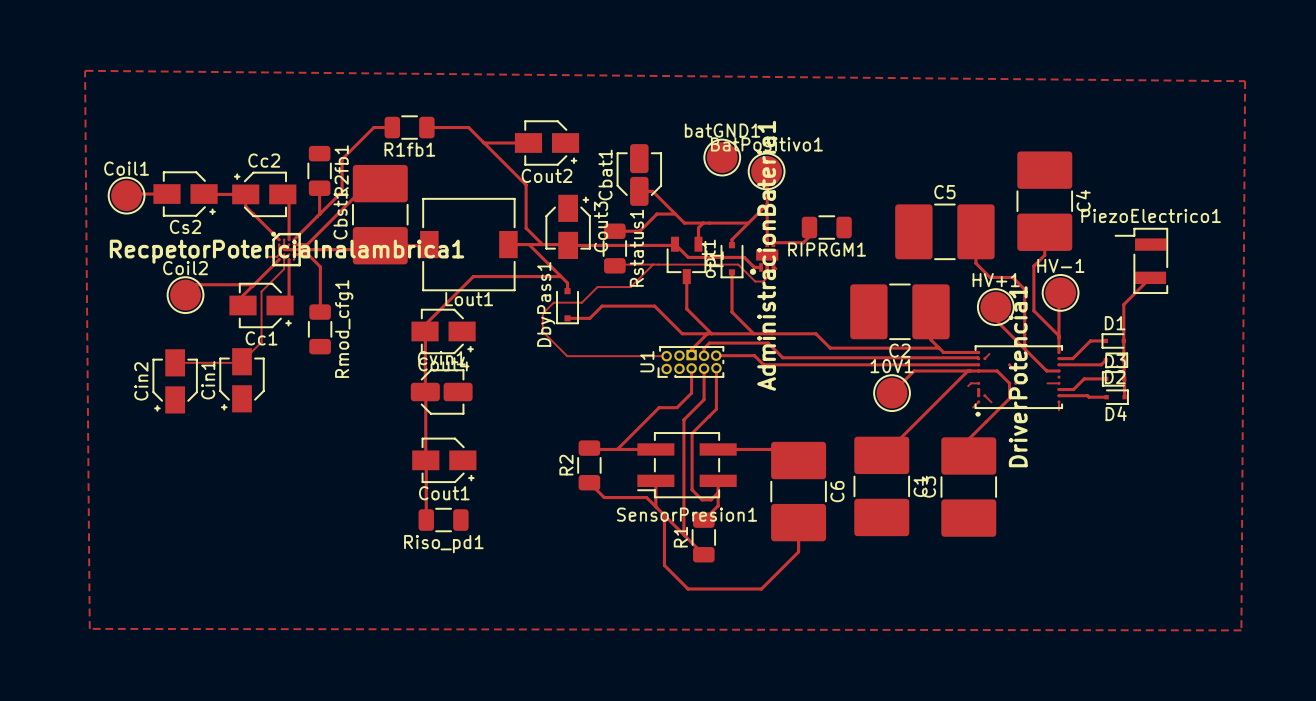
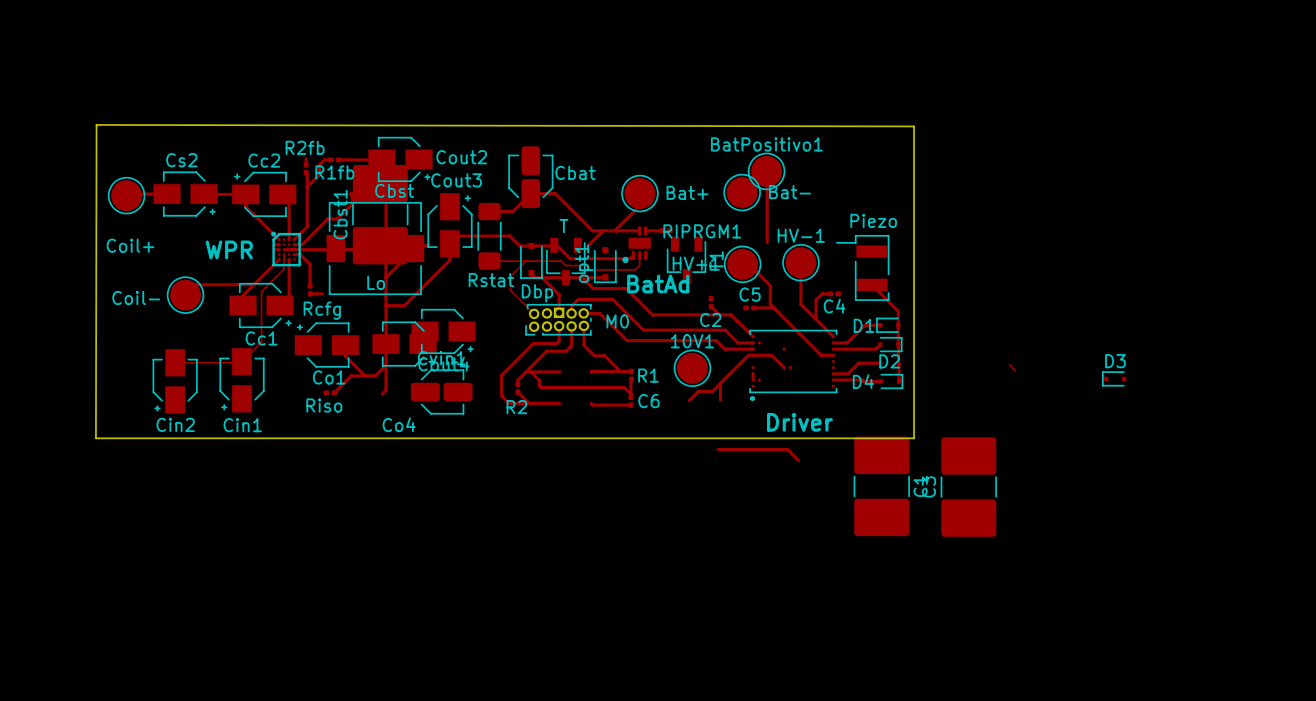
zone outline: (85, 70) (89, 628) (1241, 630) (1245, 81) (85, 70) -> none
board edge: none -> (96, 124) (95, 438) (914, 438) (914, 126) (96, 124)
track: (392, 127) (373, 127) (342, 159) (342, 191) (319, 214) -> none
R1fb1: (409, 127) -> none
track: (426, 127) (468, 127) (526, 185) (526, 228) (542, 244) -> none
track: (484, 142) (528, 142) -> none
Cout2 position: (547, 142) -> (400, 159)
C4 footprint: [1016, 151, 1073, 251] -> [827, 291, 842, 297]
batGND1: (722, 157) -> none
track: none -> (306, 158) (306, 164)
track: none -> (330, 159) (324, 159) (319, 164) (319, 174) (307, 186)
R1fb: none -> (334, 159)
track: none -> (338, 159) (381, 159) (385, 163) (385, 390) (382, 394)
Coil1 name: Coil1 (126, 168) -> Coil+ (130, 245)
R2fb: none -> (306, 168)
R2fb1: (319, 170) -> none
Cout2 name position: Cout2 (547, 175) -> Cout2 (461, 157)
Cbat1: (639, 175) -> none
Cbat: none -> (530, 177)
track: (380, 183) (368, 183) (307, 244) (302, 244) -> (352, 194) (352, 204) (337, 218) (327, 218) (302, 244)
track: (319, 188) (319, 214) (317, 216) -> none
track: (639, 191) (652, 191) (684, 223) (748, 223) -> none
Bat-: none -> (742, 192)
C5 name position: C5 (944, 192) -> C5 (750, 294)
track: none -> (639, 193) (639, 205) (615, 230)
Bat+: none -> (639, 193)
Cbst: none -> (356, 194)
C4 name position: C4 (1083, 200) -> C4 (834, 306)
C5 footprint: [895, 203, 995, 260] -> [743, 305, 757, 311]
track: (767, 204) (748, 223) -> none
track: none -> (489, 211) (512, 211) (530, 193) (555, 193) (592, 230) (639, 230)
track: (675, 214) (656, 214) (639, 231) (614, 231) -> none
RIPRGM1 footprint: [801, 215, 852, 240] -> [659, 228, 673, 234]
track: (317, 216) (301, 231) -> (306, 172) (307, 226) (301, 231)
track: (703, 223) (698, 227) (698, 244) -> none
track: (748, 223) (731, 239) (731, 245) -> none
Cs2 name position: Cs2 (185, 226) -> Cs2 (181, 160)
Cout3 position: (568, 226) -> (449, 225)
Cout3 name rotation: 0° (601, 226) -> 90° clockwise (456, 180)
track: (809, 227) (809, 236) (803, 242) (773, 242) -> none
track: none -> (603, 230) (588, 245)
track: none -> (661, 230) (645, 230)
track: (975, 231) (975, 263) (990, 277) (1012, 277) (1024, 289) (1024, 348) -> none
track: (1044, 232) (1044, 255) (1033, 266) (1033, 310) (1058, 335) -> none
Rstat: none -> (489, 236)
track: (284, 239) (284, 244) -> none
track: (279, 244) (279, 254) (276, 256) (266, 256) -> (279, 244) (274, 244)
Lout1: (468, 244) -> none
track: (508, 244) (675, 244) (688, 257) (744, 257) (754, 267) (761, 267) -> none
track: (529, 244) (567, 283) (567, 291) -> none
BatAd: none -> (636, 244)
Lo: none -> (375, 248)
track: none -> (414, 248) (385, 277)
Rstatus1: (614, 248) -> none
track: none -> (273, 249) (279, 249)
RIPRGM1 name position: RIPRGM1 (827, 249) -> RIPRGM1 (702, 231)
RecpetorPotenciaInalambrica1 name: RecpetorPotenciaInalambrica1 (286, 251) -> WPR (229, 249)
track: (300, 254) (308, 254) (320, 266) (320, 312) -> (300, 254) (309, 264) (310, 285)
track: none -> (633, 255) (630, 258) (570, 258) (556, 245) (519, 245) (509, 236) (457, 236) (449, 243) (449, 260) (404, 305) (385, 305)
track: none -> (639, 255) (639, 265) (635, 269) (589, 269) (585, 265) (565, 265) (561, 261) (489, 261)
AdministracionBateria1: (764, 256) -> none
Dbp: none -> (531, 260)
opt1 position: (731, 260) -> (605, 265)
PiezoElectrico1: (1141, 260) -> none
track: none -> (525, 261) (510, 276) (510, 290) (534, 313)
T: none -> (565, 261)
track: none -> (800, 262) (800, 304) (812, 316)
track: (653, 264) (630, 287) (597, 287) (581, 302) (553, 302) (542, 313) (542, 331) (567, 356) (666, 356) -> none
track: none -> (742, 264) (748, 264) (770, 285) (770, 304) (821, 355) (833, 355)
track: (614, 265) (738, 264) (755, 281) (763, 281) (767, 277) (767, 267) -> none
track: (773, 267) (776, 268) -> none
Piezo: none -> (862, 267)
Coil2 name: Coil2 (185, 268) -> Coil- (136, 297)
track: (731, 272) (731, 312) (753, 333) -> none
track: none -> (531, 273) (533, 277) (605, 277)
track: (560, 276) (473, 276) (425, 324) (426, 520) -> none
track: (686, 276) (686, 308) (711, 333) -> none
track: none -> (541, 277) (559, 294) (559, 312)
track: none -> (582, 277) (593, 288) (626, 288) (652, 314) (730, 314) (753, 336)
track: (1150, 277) (1123, 304) (1124, 397) -> none
HV+1 name position: HV+1 (996, 280) -> HV+1 (696, 263)
C2 footprint: [850, 283, 950, 340] -> [708, 295, 714, 310]
track: none -> (871, 284) (898, 311) (899, 381)
Rcfg: none -> (310, 289)
track: (1060, 292) (1058, 294) (1058, 352) -> none
HV-1 position: (1060, 292) -> (800, 262)
track: none -> (310, 293) (322, 293)
track: none -> (830, 293) (822, 293) (816, 300) (816, 319)
DbyPass1: (567, 306) -> none
track: none -> (711, 306) (719, 314)
track: none -> (753, 307) (773, 307)
track: (995, 307) (995, 320) (1046, 370) (1058, 370) -> none
HV+1 position: (995, 307) -> (742, 264)
track: (930, 311) (930, 339) (943, 352) (978, 352) -> none
track: none -> (571, 313) (571, 306) (578, 299) (612, 299) (643, 330) (725, 330) (738, 342) (753, 342)
track: none -> (583, 313) (599, 313) (626, 340) (716, 340) (724, 349) (753, 349)
track: none -> (813, 316) (833, 336)
track: (567, 318) (589, 318) (602, 306) (654, 306) (682, 333) (815, 333) (830, 348) (939, 348) -> none
M0: none -> (558, 319)
D1 name position: D1 (1115, 323) -> D1 (864, 325)
track: none -> (583, 325) (583, 345) (594, 355) (604, 355) (620, 371)
track: none -> (559, 326) (559, 341) (556, 343) (533, 343) (501, 375) (501, 395) (509, 403) (559, 403)
track: none -> (571, 326) (571, 345) (566, 351) (546, 351) (517, 380) (517, 384)
Rmod_cfg1: (320, 329) -> none
track: (707, 333) (691, 349) (691, 355) -> none
track: (1105, 340) (1090, 340) (1072, 358) (1058, 358) -> (880, 325) (864, 325) (847, 342) (833, 342)
D1 position: (1113, 340) -> (888, 325)
Co4: none -> (404, 344)
Co1: none -> (326, 345)
track: none -> (345, 345) (345, 356) (365, 375)
track: (989, 353) (984, 358) -> none
track: (704, 355) (704, 348) (709, 343) (768, 343) (782, 357) (978, 358) -> none
track: (716, 355) (754, 355) (763, 364) (978, 364) -> none
track: (1105, 360) (1101, 364) (1058, 364) -> (880, 344) (875, 349) (833, 349)
D2 position: (1115, 360) -> (890, 344)
U1: (690, 361) -> none
Driver: none -> (793, 365)
track: none -> (385, 366) (375, 375) (351, 375) (334, 392)
track: none -> (784, 367) (771, 355) (748, 355) (720, 383) (720, 400)
track: (691, 368) (691, 393) (677, 407) (659, 407) (617, 449) (614, 449) -> none
track: (704, 368) (704, 399) (683, 419) (684, 535) -> none
track: (716, 368) (716, 409) (709, 416) -> none
track: (967, 370) (881, 455) -> none
track: none -> (526, 371) (559, 371)
track: none -> (531, 371) (539, 380) (541, 387) (624, 387) (630, 394)
track: none -> (631, 371) (591, 371)
track: (1106, 378) (1084, 378) (1073, 389) (1058, 389) -> (880, 363) (858, 363) (848, 373) (833, 373)
track: none -> (631, 379) (630, 397)
Cin1 name rotation: 0° (208, 380) -> 90° clockwise (242, 425)
Cin1 name position: Cin1 (208, 380) -> Cin1 (242, 425)
Cin2 name rotation: 0° (141, 381) -> 90° clockwise (175, 424)
Cin2 name position: Cin2 (141, 381) -> Cin2 (175, 424)
DriverPotencia1: (1018, 381) -> none
track: none -> (720, 383) (712, 391) (698, 391) (689, 400)
track: (978, 383) (970, 383) (968, 386) -> none
track: (1047, 383) (1058, 383) -> none
track: (978, 389) (978, 395) -> (753, 373) (753, 380)
Riso: none -> (330, 392)
track: none -> (517, 392) (529, 403)
track: (892, 393) (914, 370) (997, 370) (1009, 383) (1009, 398) (968, 439) (968, 455) -> none
10V1 position: (892, 393) -> (692, 368)
track: (984, 395) (991, 402) -> none
track: (1058, 395) (1106, 397) -> (833, 380) (881, 381)
D4 position: (1116, 397) -> (891, 381)
track: (978, 401) (973, 407) -> none
track: (1058, 401) (1058, 410) -> none
track: none -> (591, 403) (592, 405) (630, 405)
D4 name position: D4 (1116, 413) -> D4 (863, 381)
track: (709, 416) (692, 433) (692, 489) (702, 499) (710, 499) (718, 492) -> none
R2 footprint: [577, 440, 602, 491] -> [515, 381, 521, 395]
C6 footprint: [770, 441, 827, 542] -> [628, 394, 634, 408]
track: (589, 448) (655, 449) -> none
Cout1: (444, 460) -> none
R2 name position: R2 (566, 465) -> R2 (516, 407)
SensorPresion1: (687, 465) -> none
track: (655, 480) (655, 506) -> none
track: (718, 480) (718, 505) (703, 520) -> none
track: (589, 482) (604, 497) (646, 497) (703, 554) -> none
R1 footprint: [691, 512, 716, 563] -> [629, 368, 635, 383]
track: (664, 515) (664, 565) (688, 588) (761, 588) (798, 551) (798, 522) -> none
Riso_pd1: (443, 520) -> none
R1 name position: R1 (680, 537) -> R1 (648, 375)

